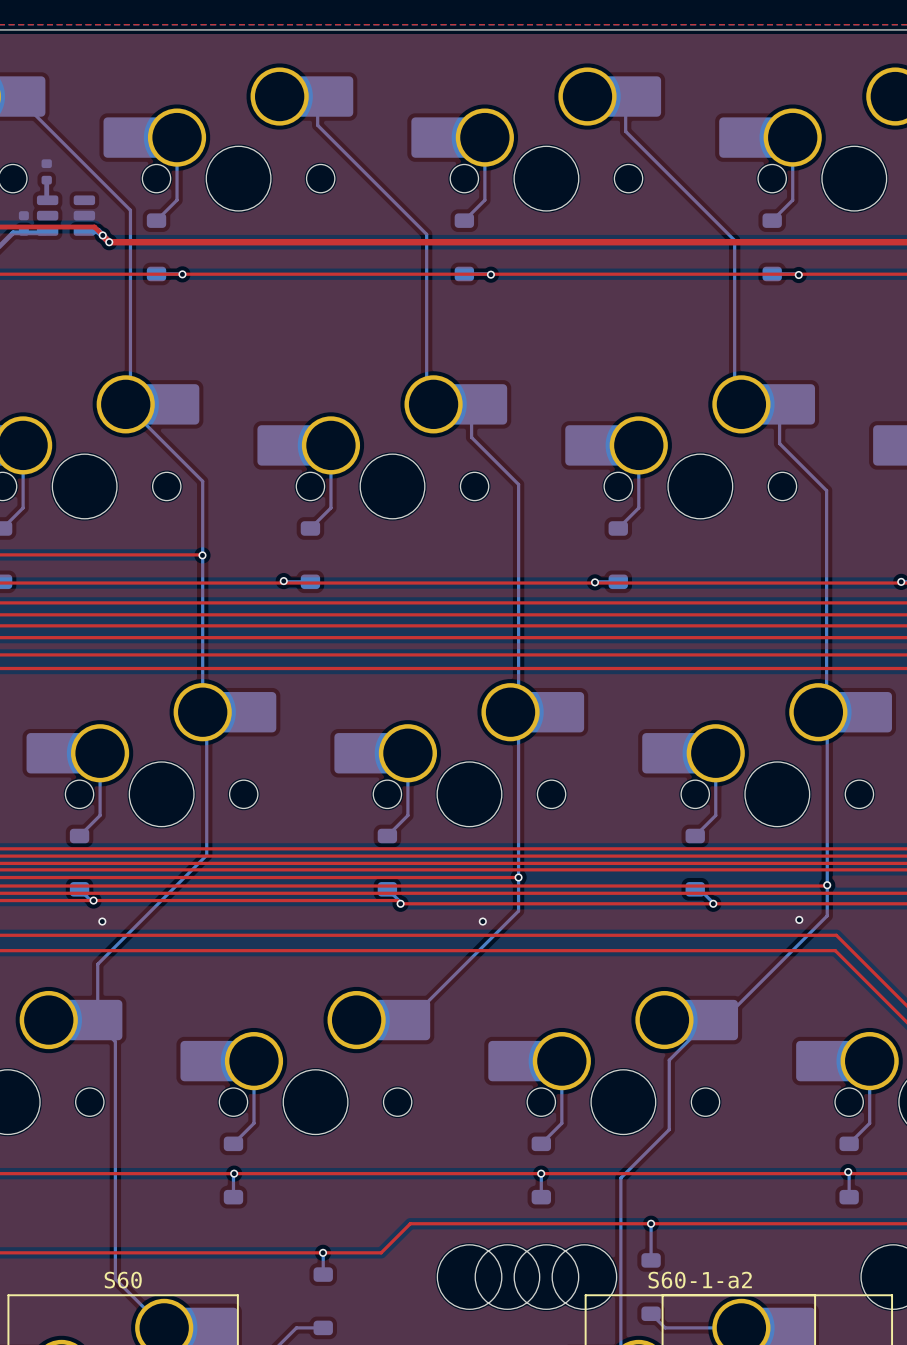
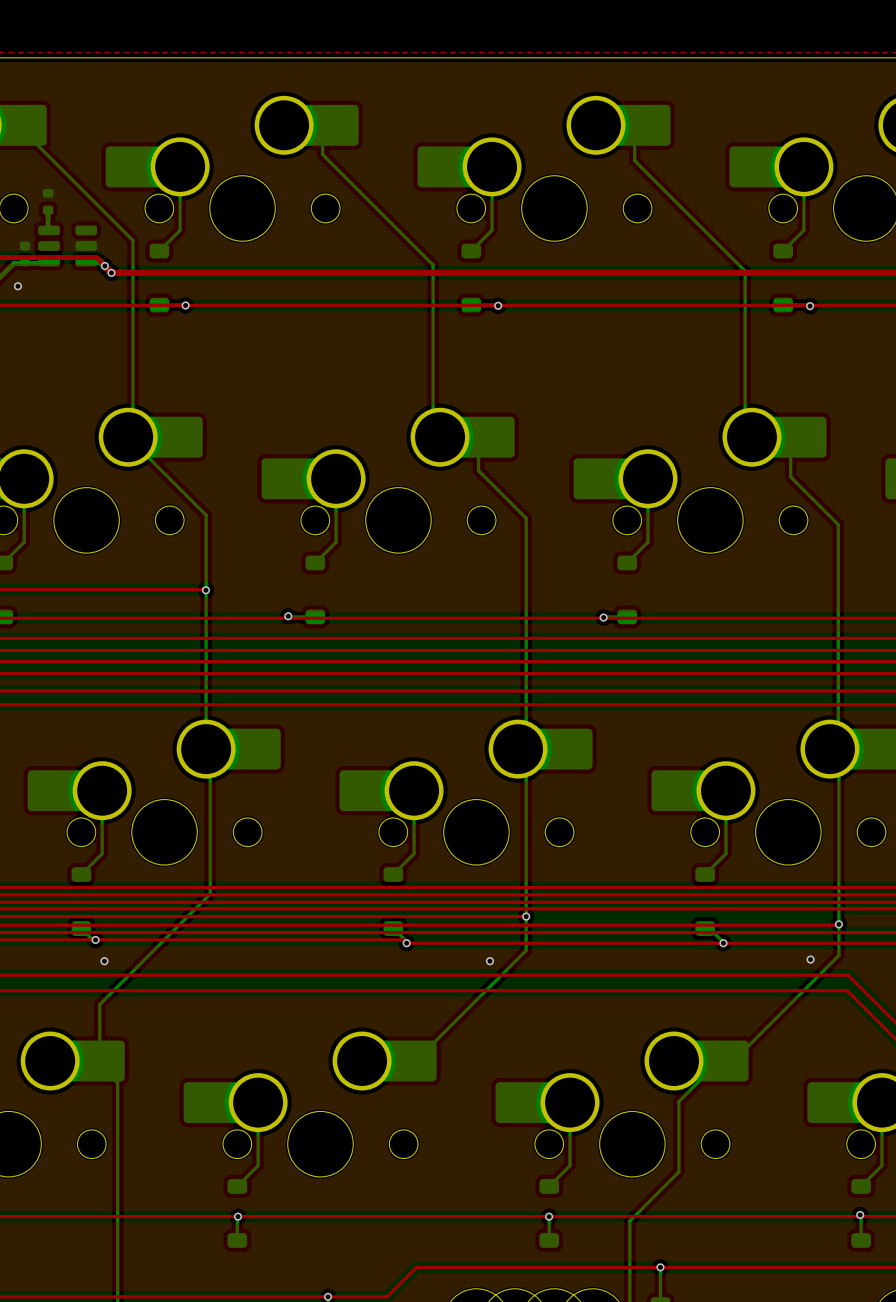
via: none -> (17, 286)

